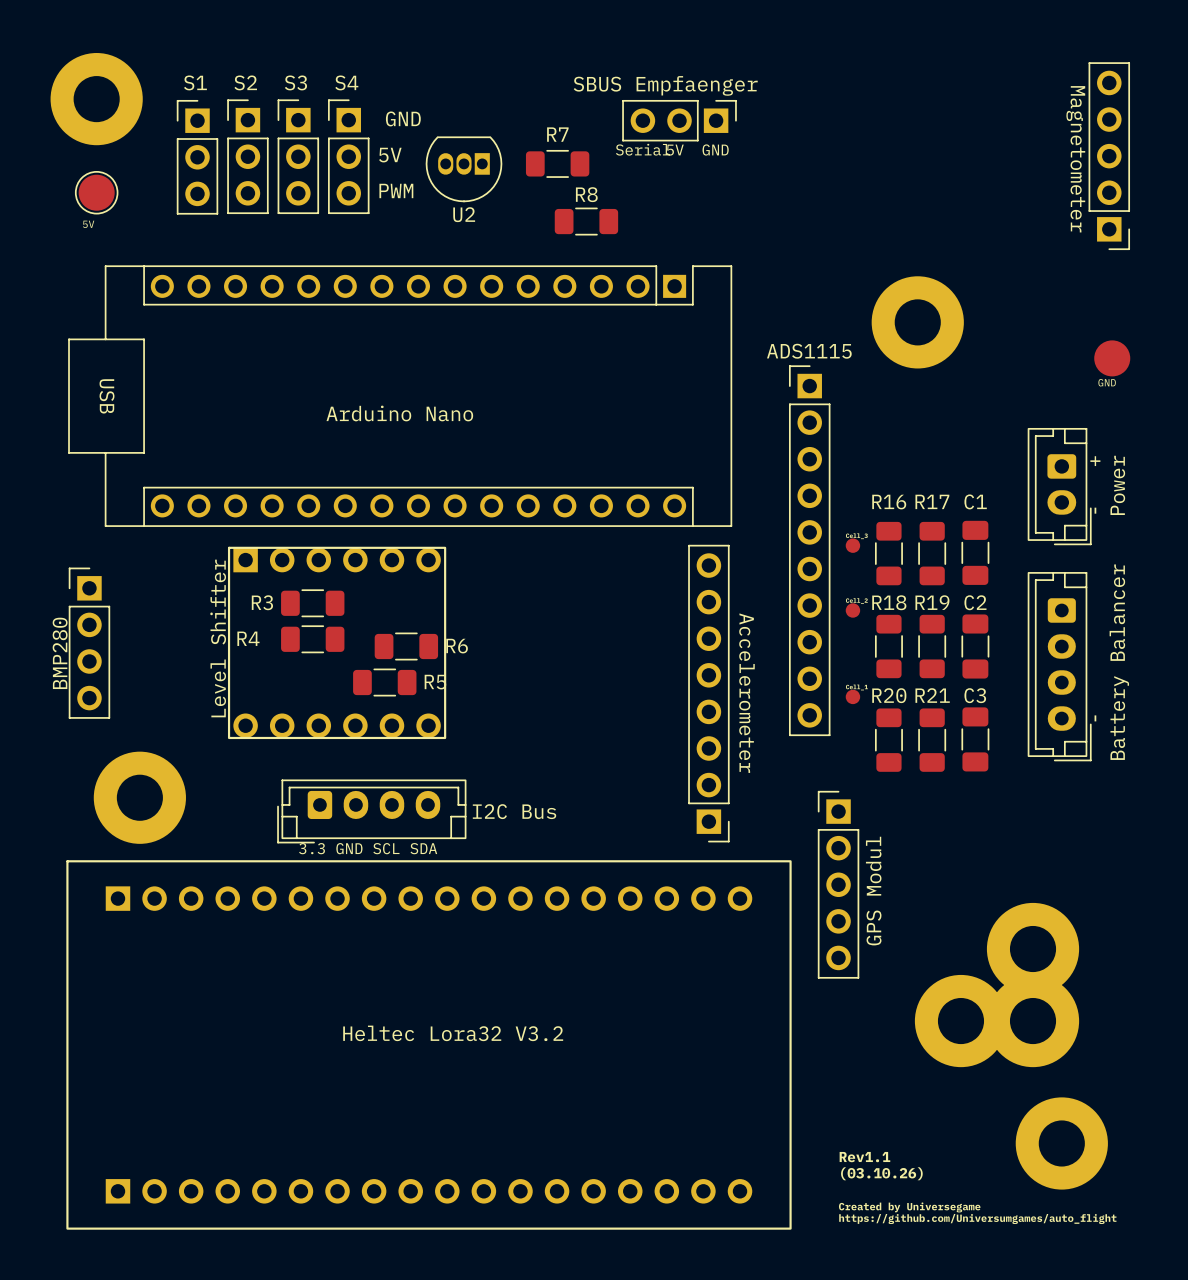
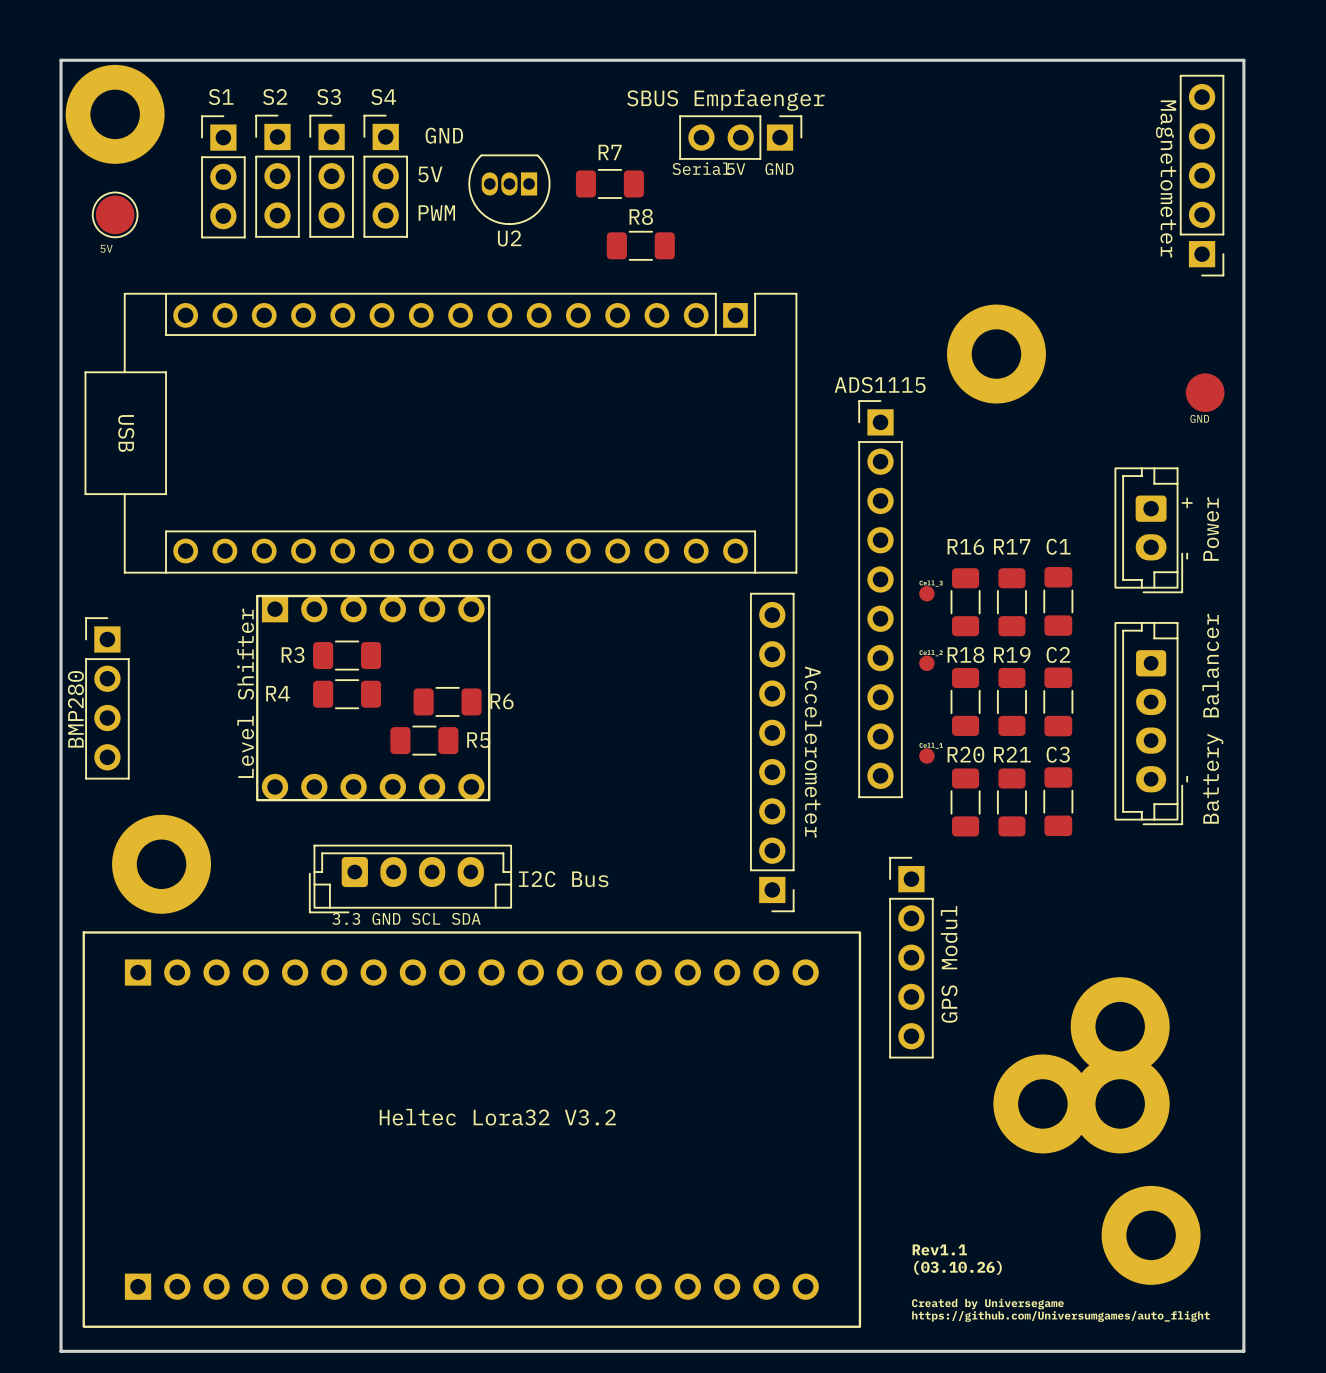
board edge: none -> (61, 60) (1243, 60) (1243, 1351) (61, 1351) (61, 60)
part value: Arduino Nano (399, 413) -> none

